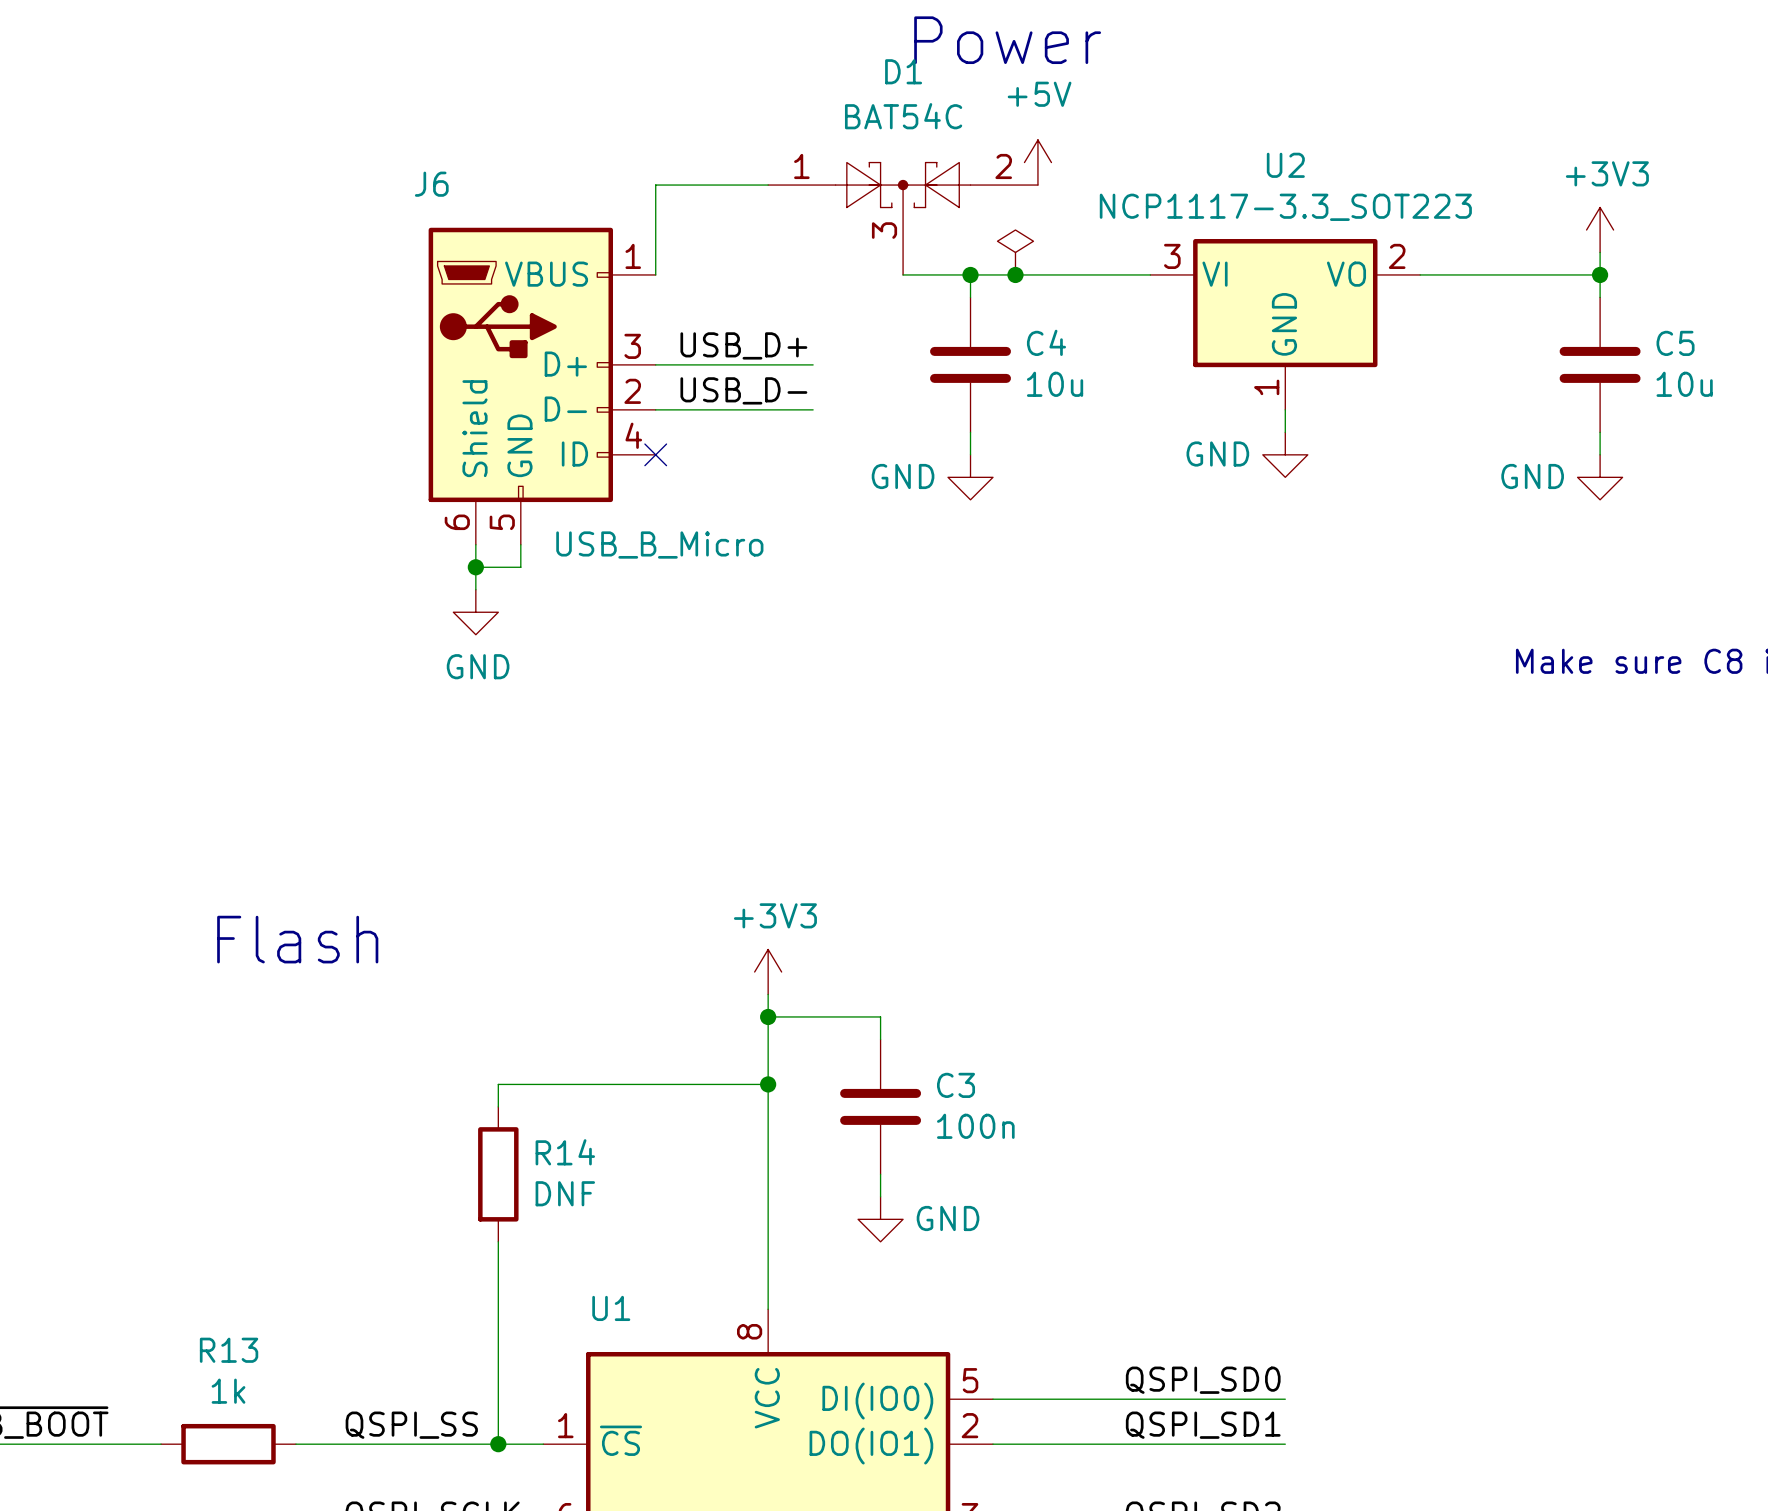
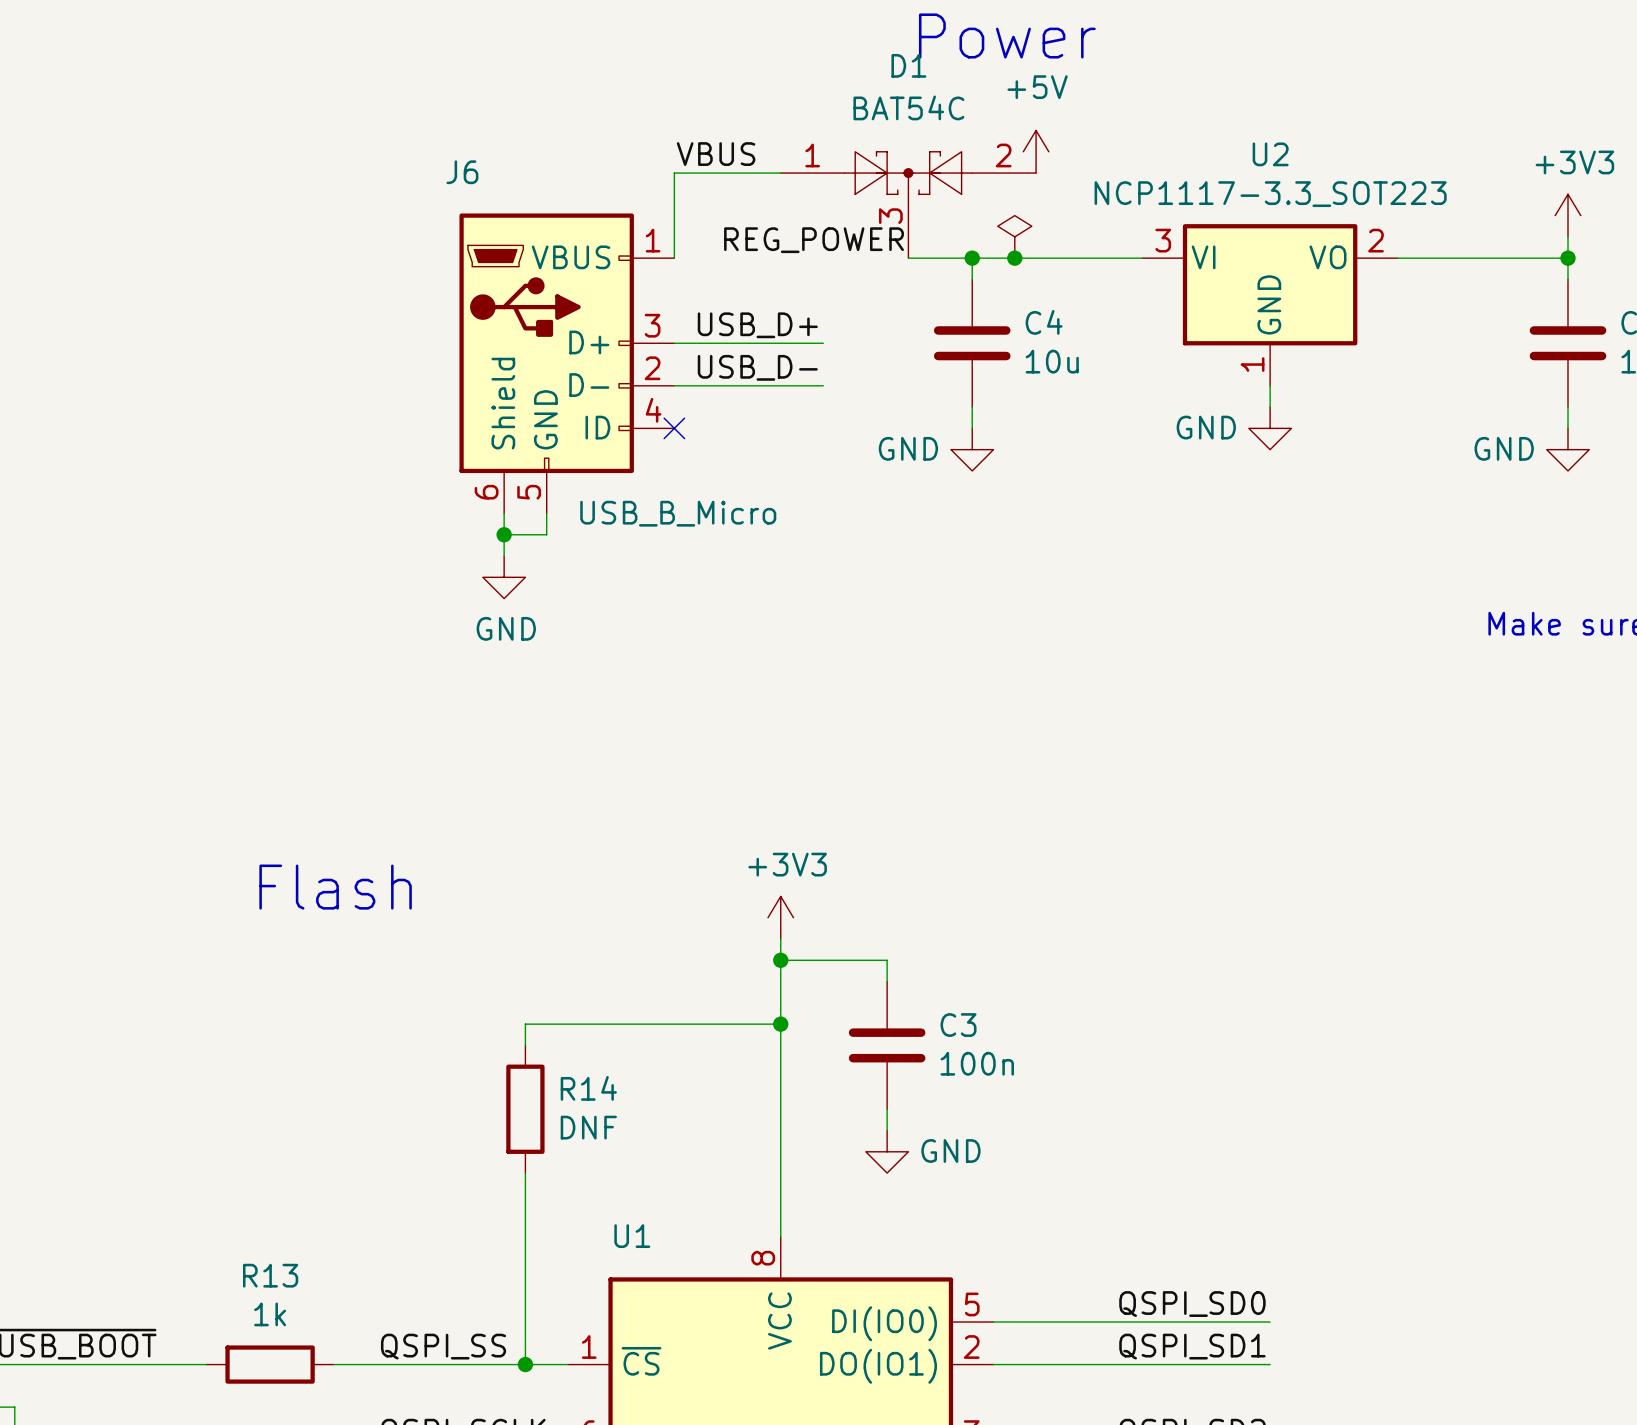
label: none -> VBUS (716, 154)
label: none -> REG_POWER (814, 240)

